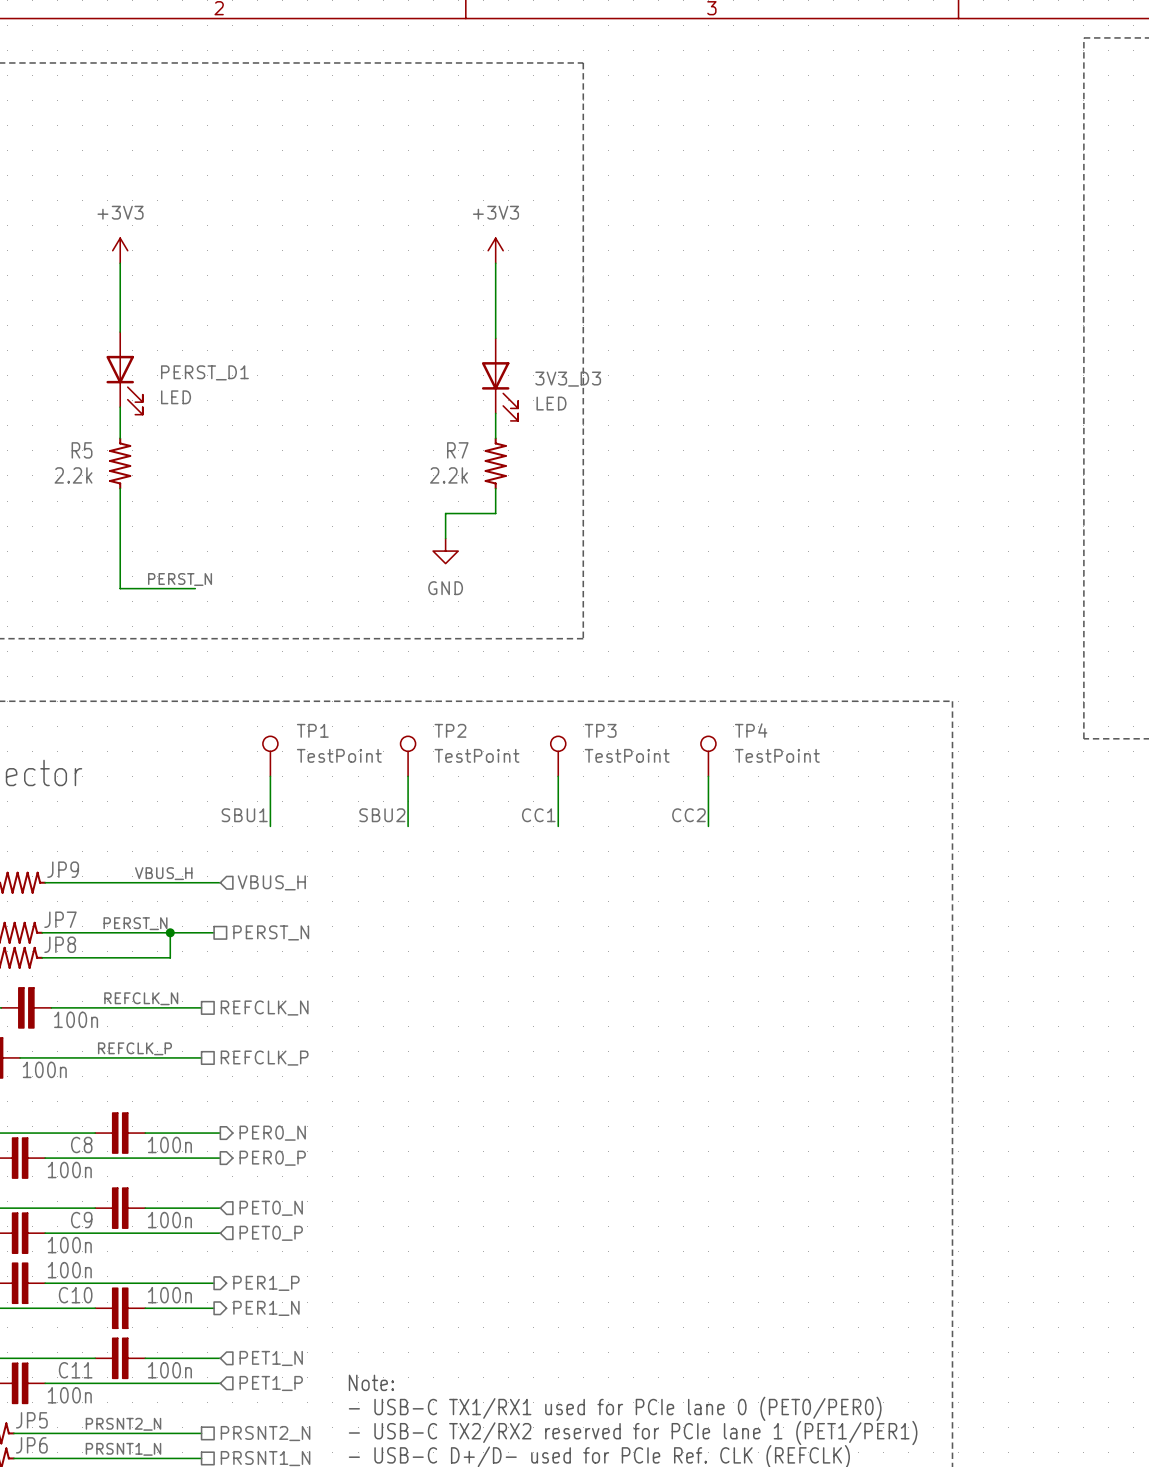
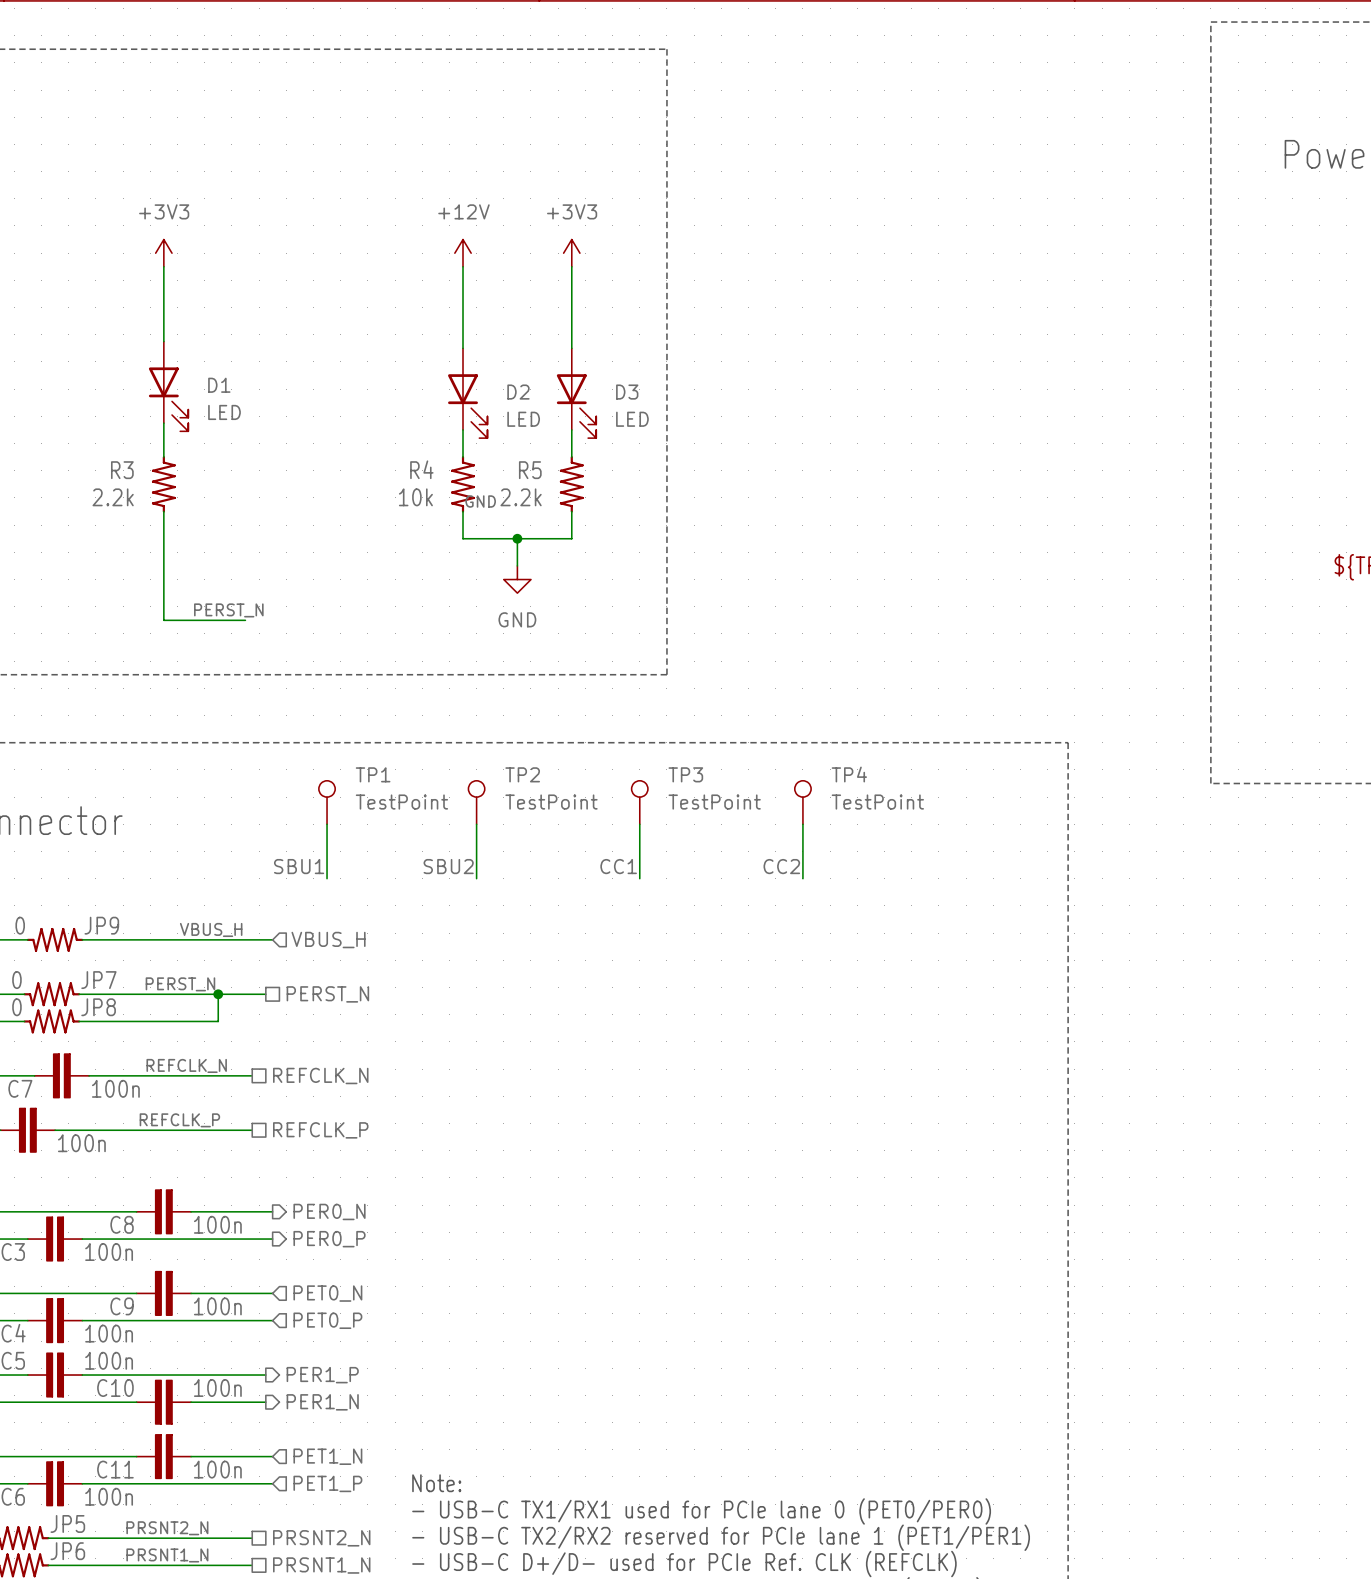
power symbol: none -> +12V (463, 253)
wire: none -> (463, 266) (463, 348)
PERST_D1 name: PERST_D1 (204, 372) -> D1 (219, 385)
D2: none -> LED (467, 393)
3V3_D3 name: 3V3_D3 (568, 379) -> D3 (627, 392)
wire: none -> (463, 429) (463, 457)
R5 name: R5 (82, 450) -> R3 (122, 470)
R7 name: R7 (457, 450) -> R5 (530, 470)
R4: none -> 10k (463, 484)
label: none -> GND (480, 501)
wire: none -> (463, 511) (463, 538) (517, 538)
junction: none -> (517, 538)

